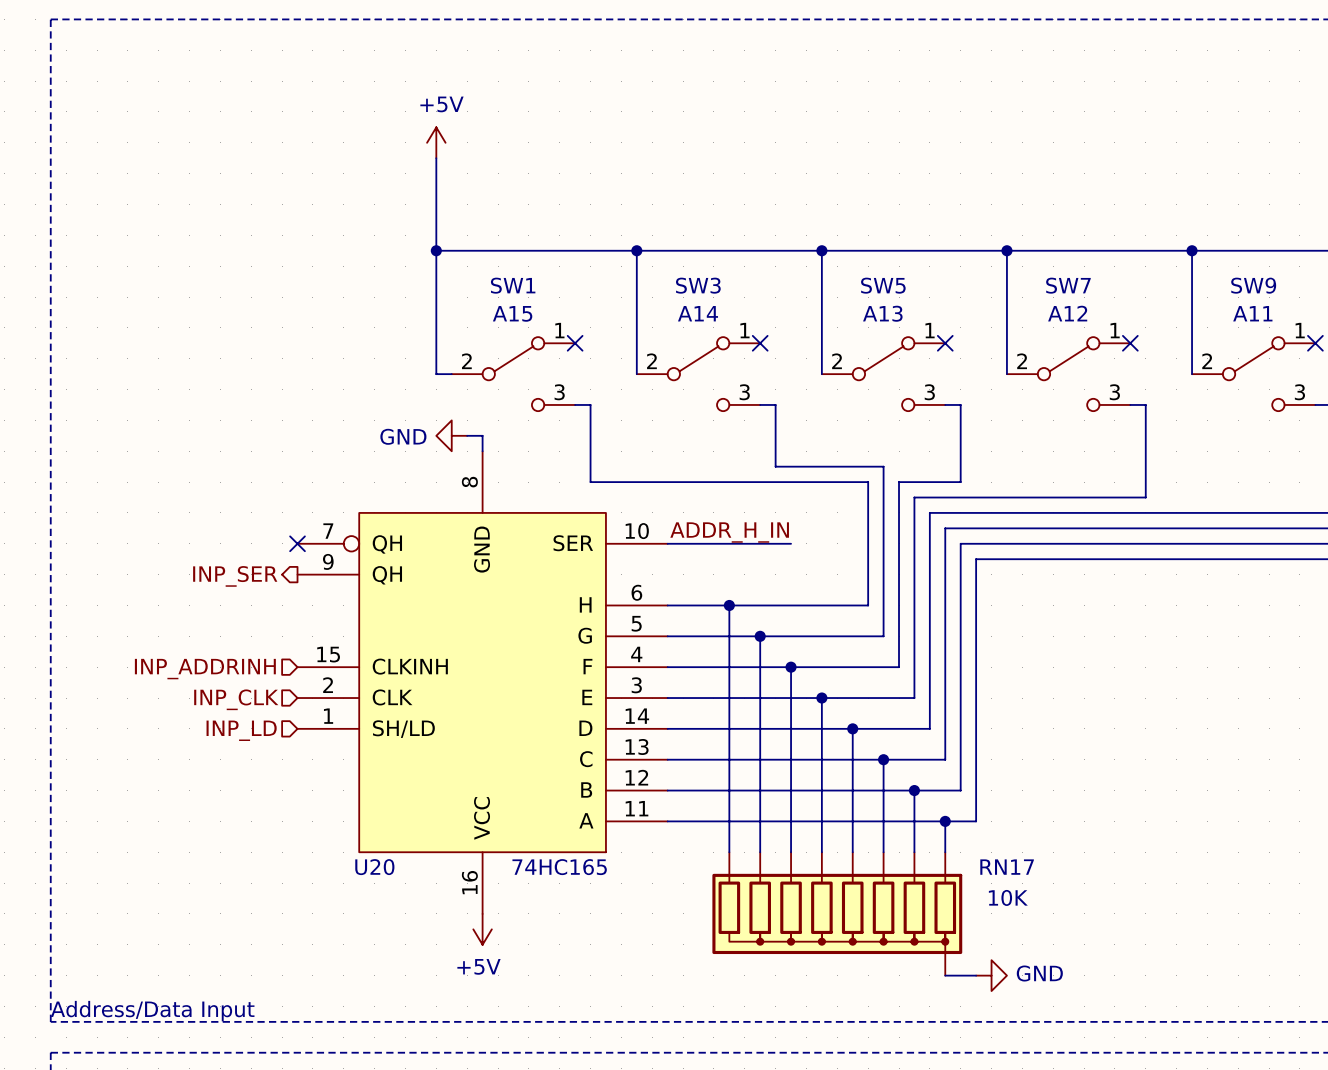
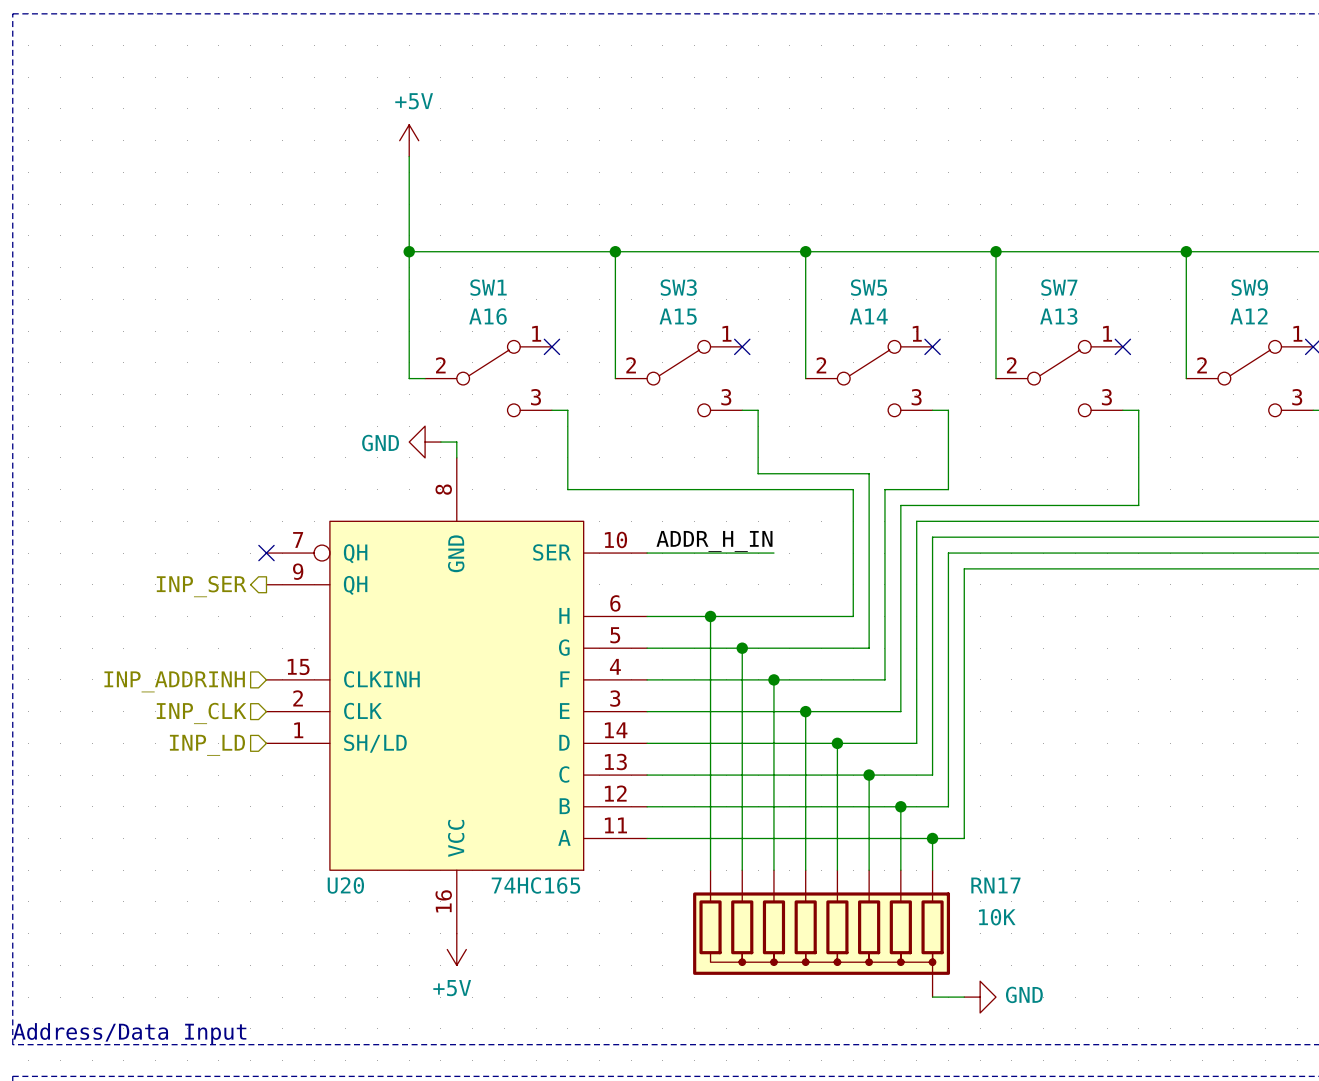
SW1 value: A15 (512, 313) -> A16 (488, 316)
SW3 value: A14 (697, 313) -> A15 (678, 316)
SW5 value: A13 (882, 313) -> A14 (868, 316)
SW7 value: A12 (1067, 313) -> A13 (1058, 316)
SW9 value: A11 (1252, 313) -> A12 (1249, 316)

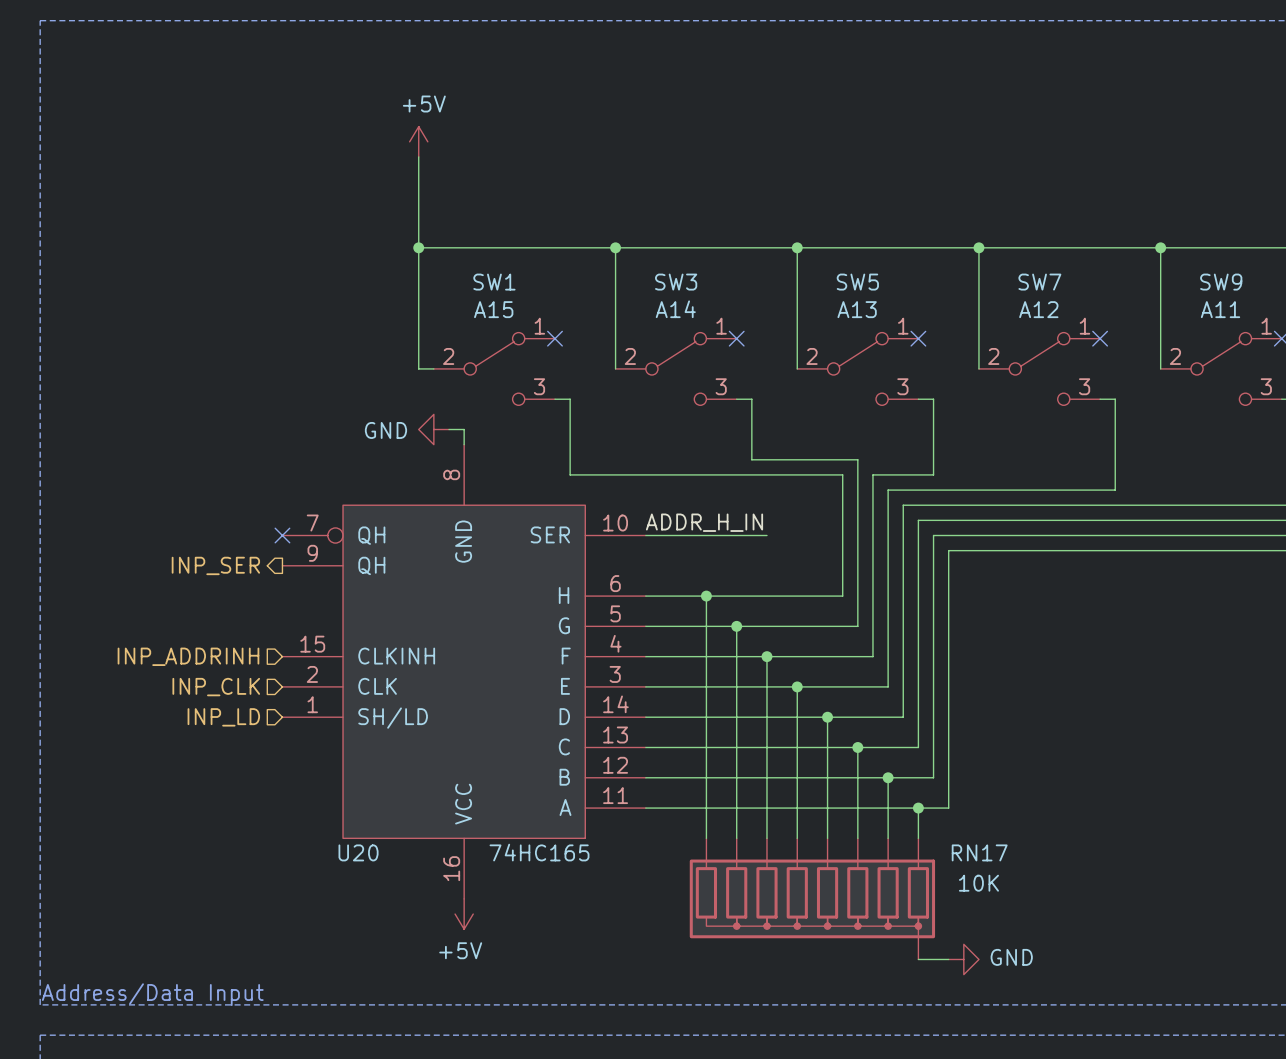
SW1 value: A16 (488, 316) -> A15 (493, 309)
SW3 value: A15 (678, 316) -> A14 (675, 309)
SW5 value: A14 (868, 316) -> A13 (857, 309)
SW7 value: A13 (1058, 316) -> A12 (1038, 309)
SW9 value: A12 (1249, 316) -> A11 (1220, 309)

